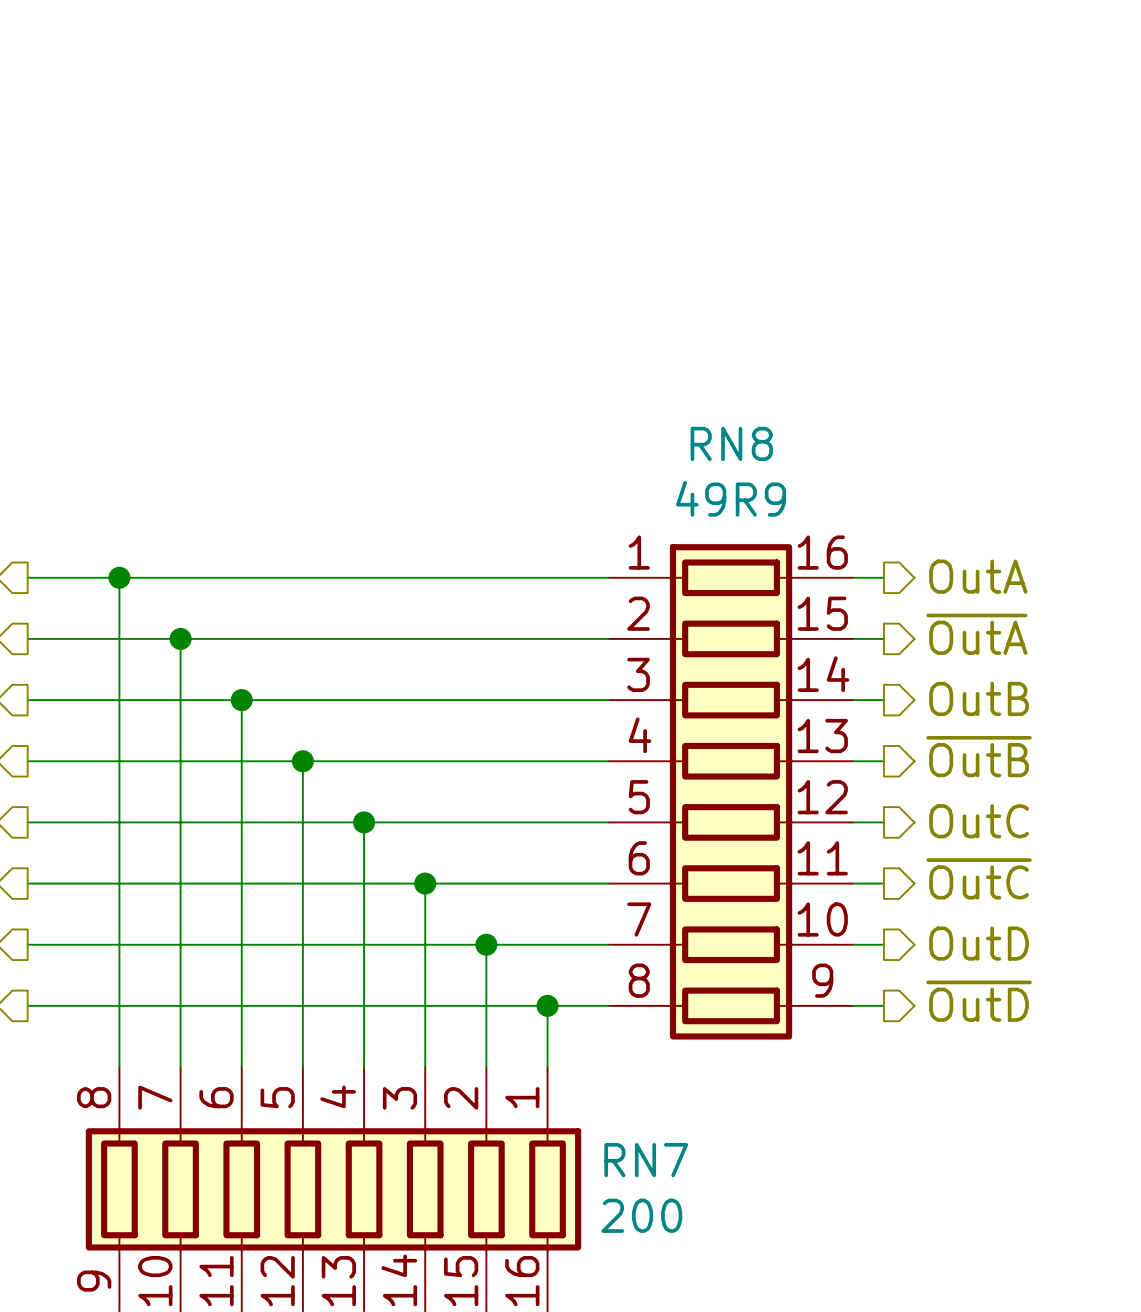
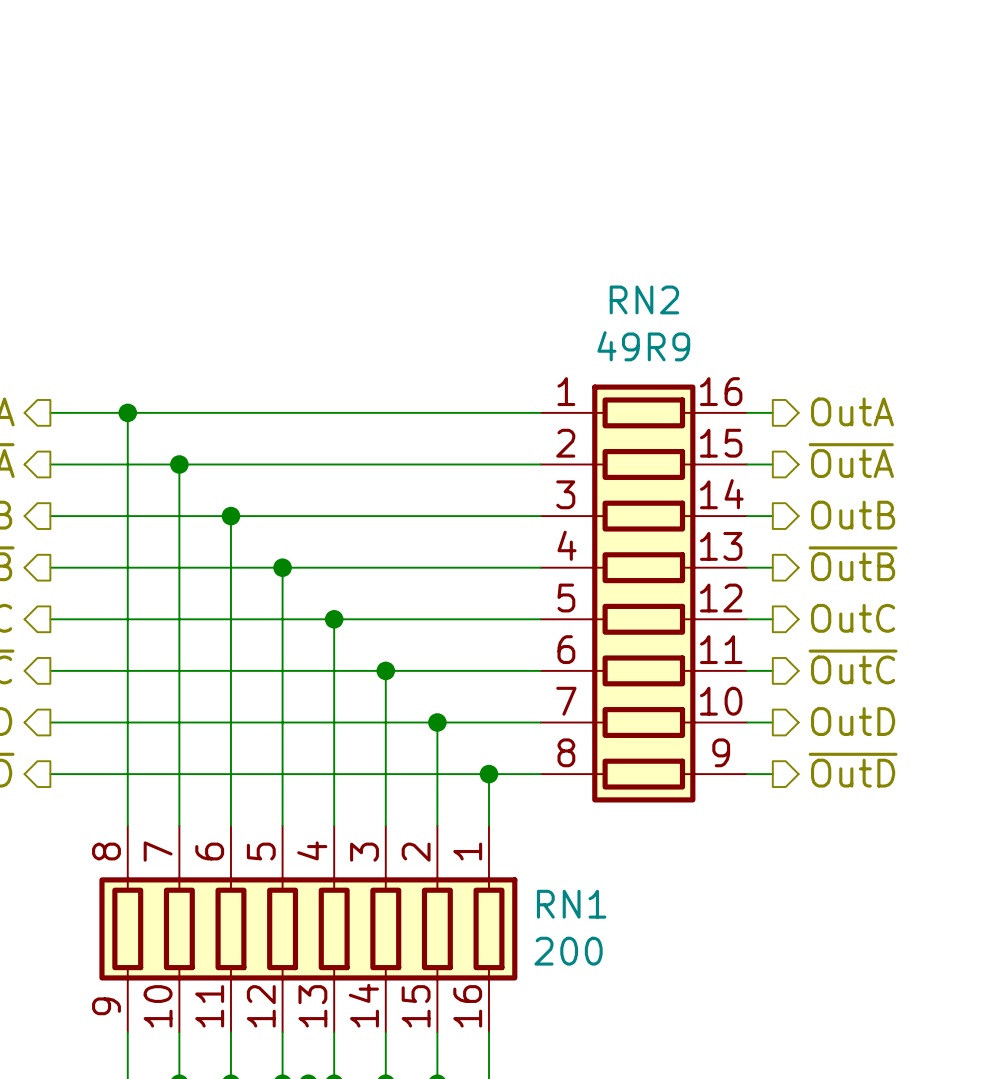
RN8 name: RN8 (731, 443) -> RN2 (644, 299)
RN7 name: RN7 (646, 1160) -> RN1 (571, 904)

